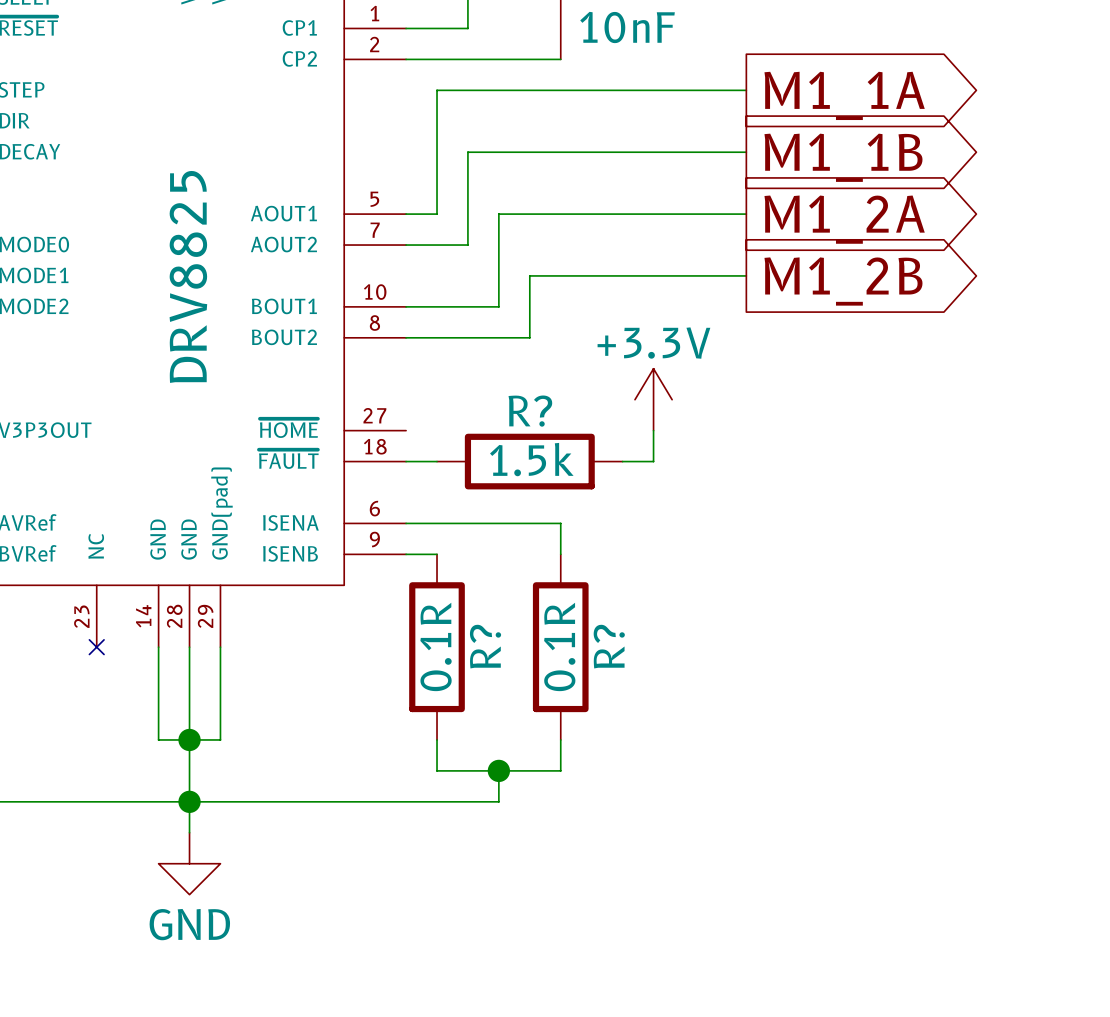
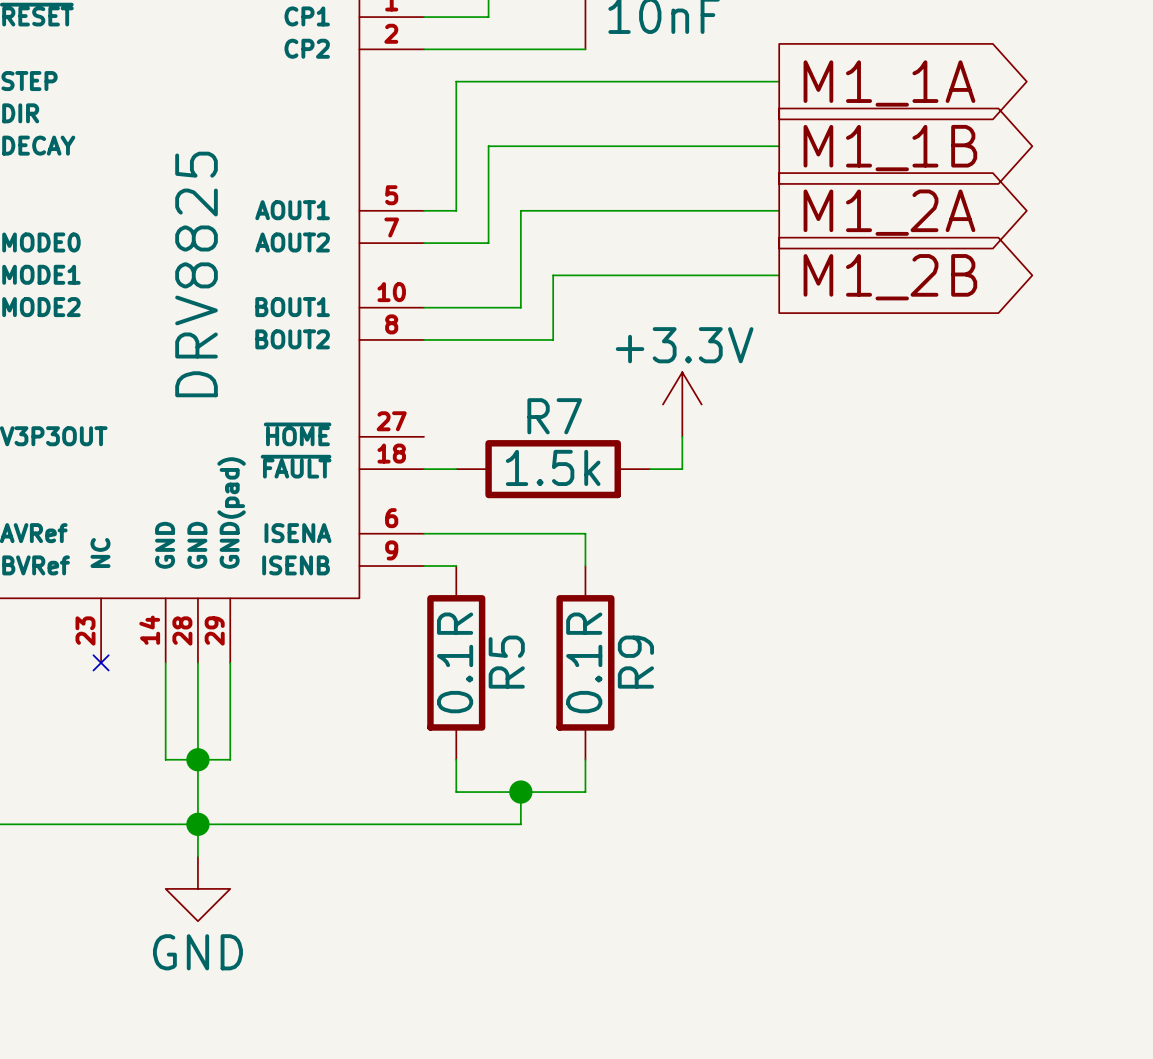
R? name: R? (530, 411) -> R7 (554, 416)
R? name: R? (485, 646) -> R5 (506, 662)
R? name: R? (609, 646) -> R9 (635, 662)

